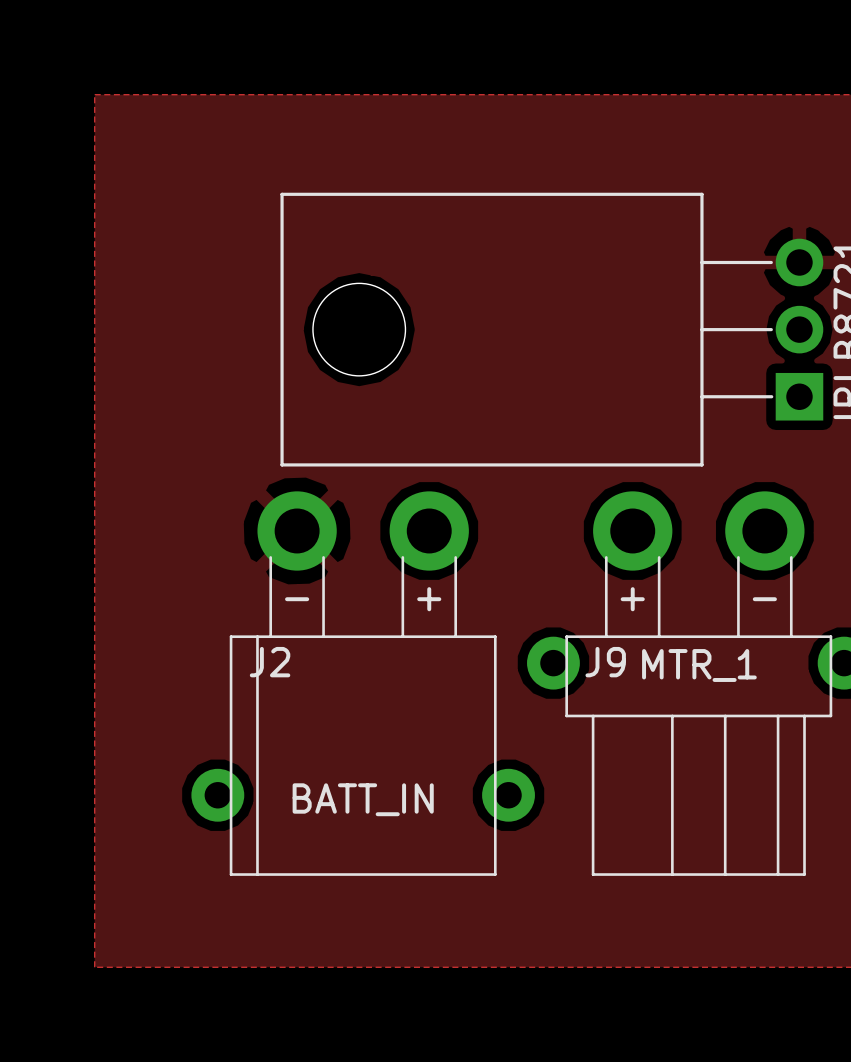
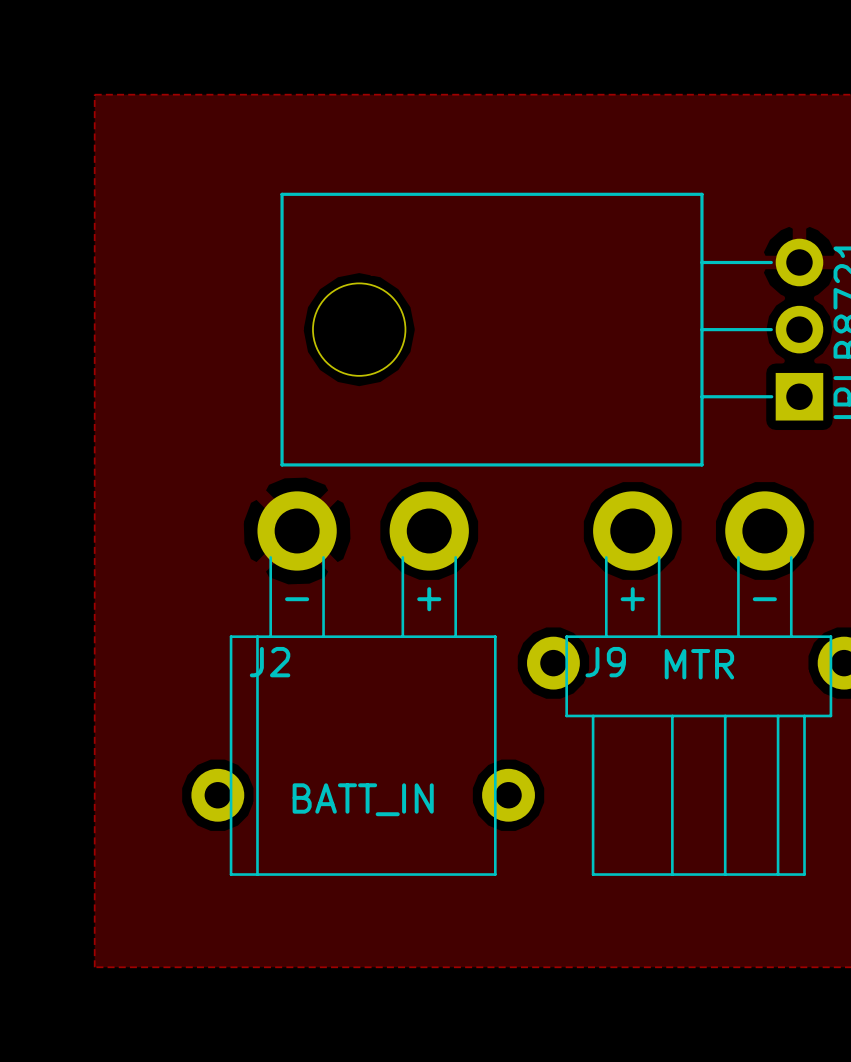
J9 value: MTR_1 (699, 665) -> MTR (699, 664)

